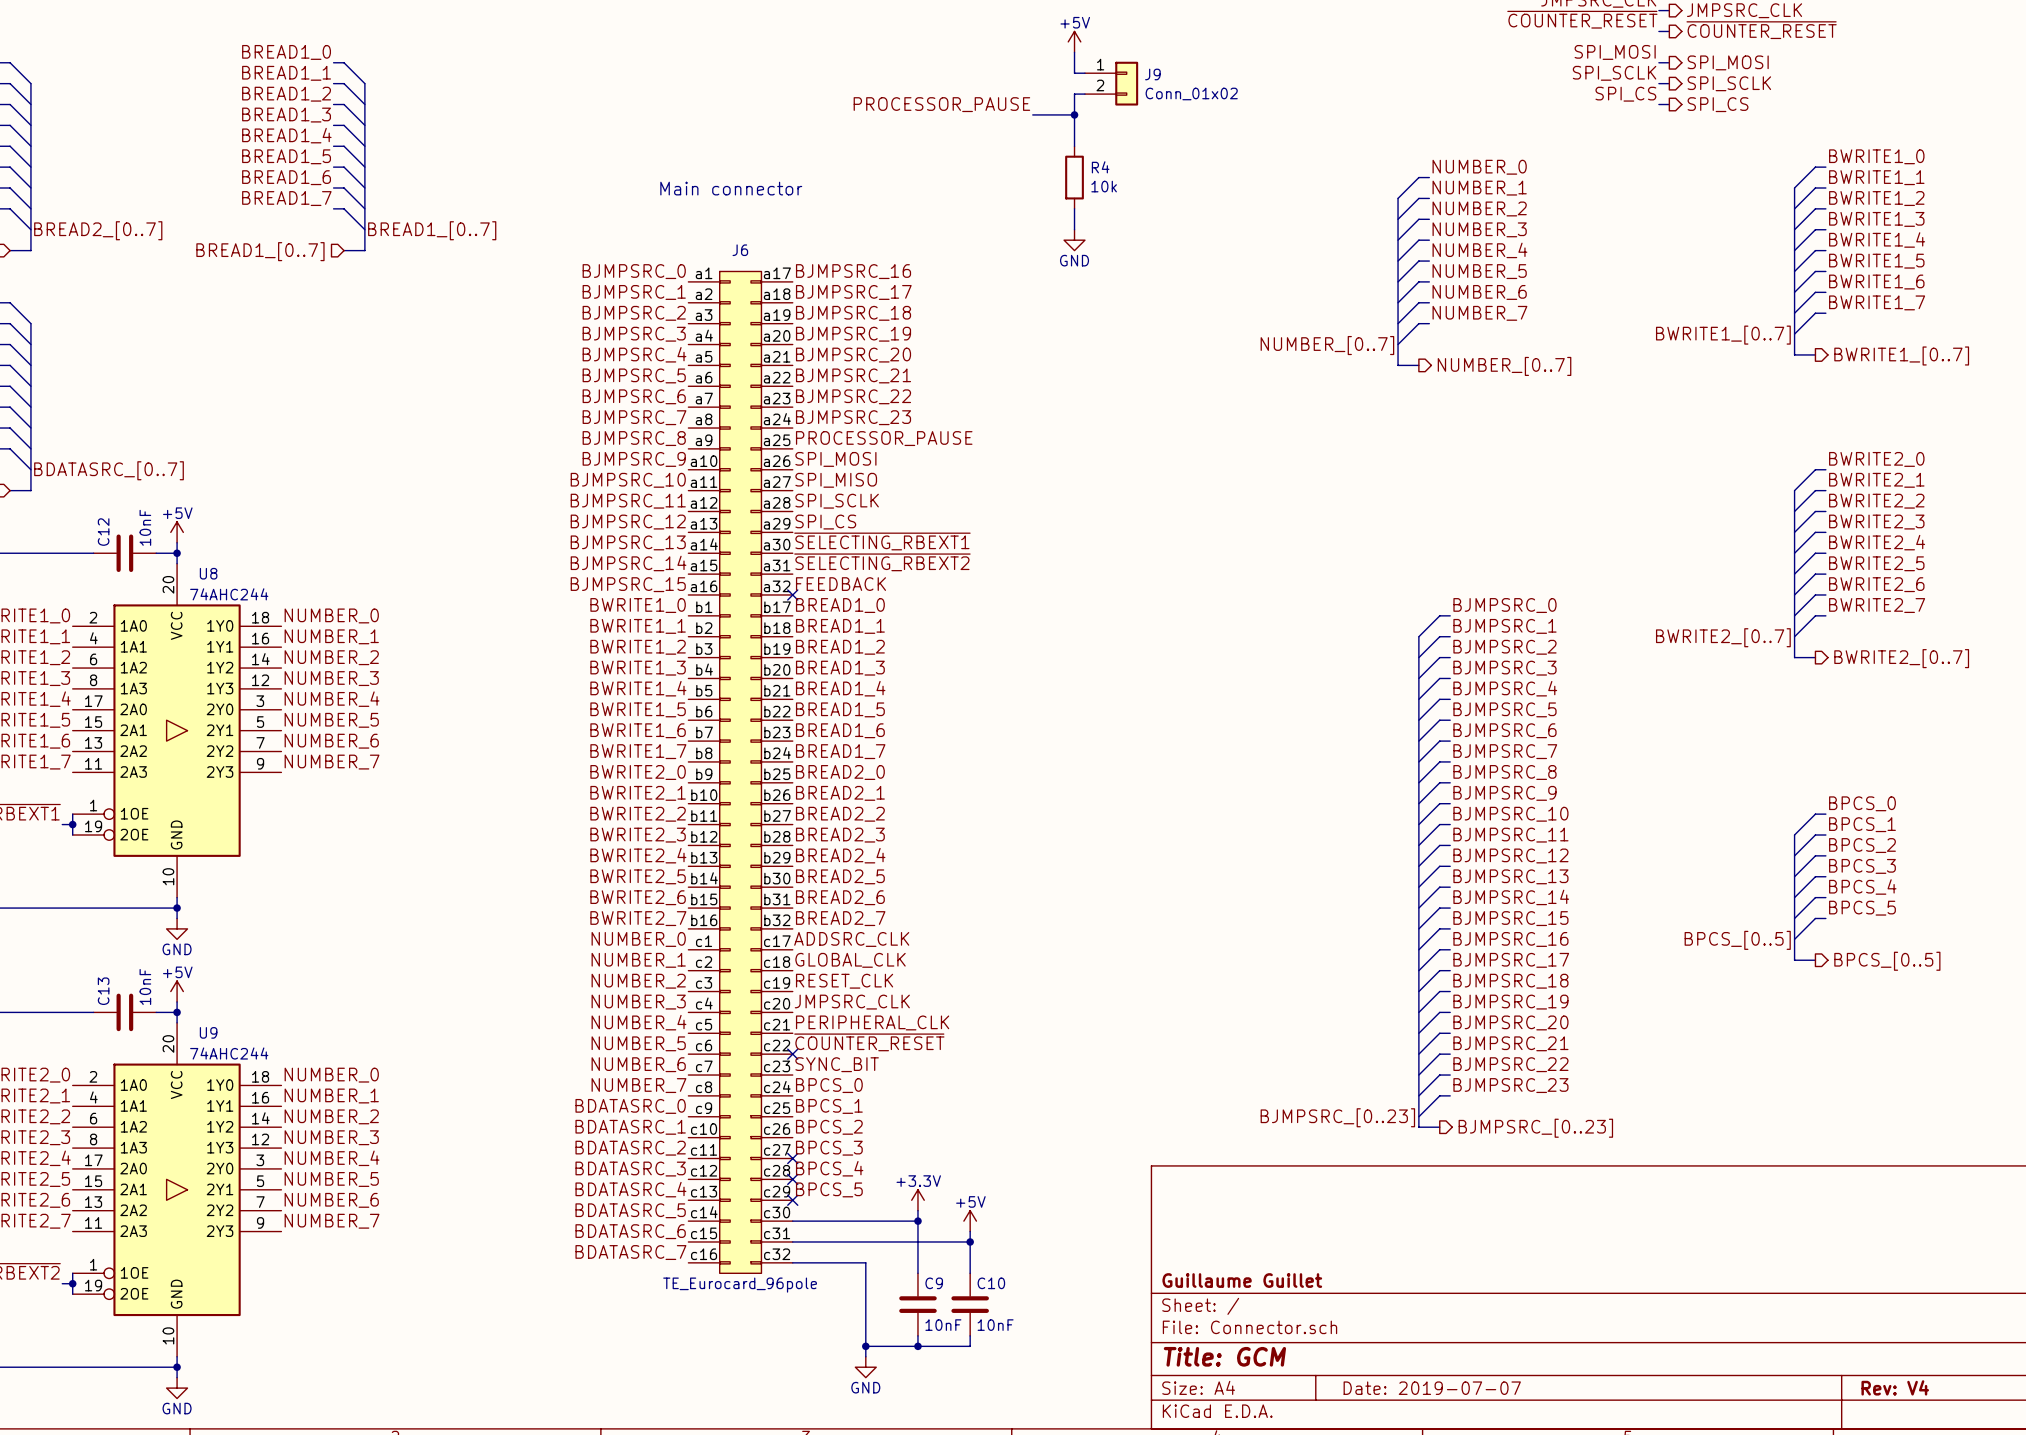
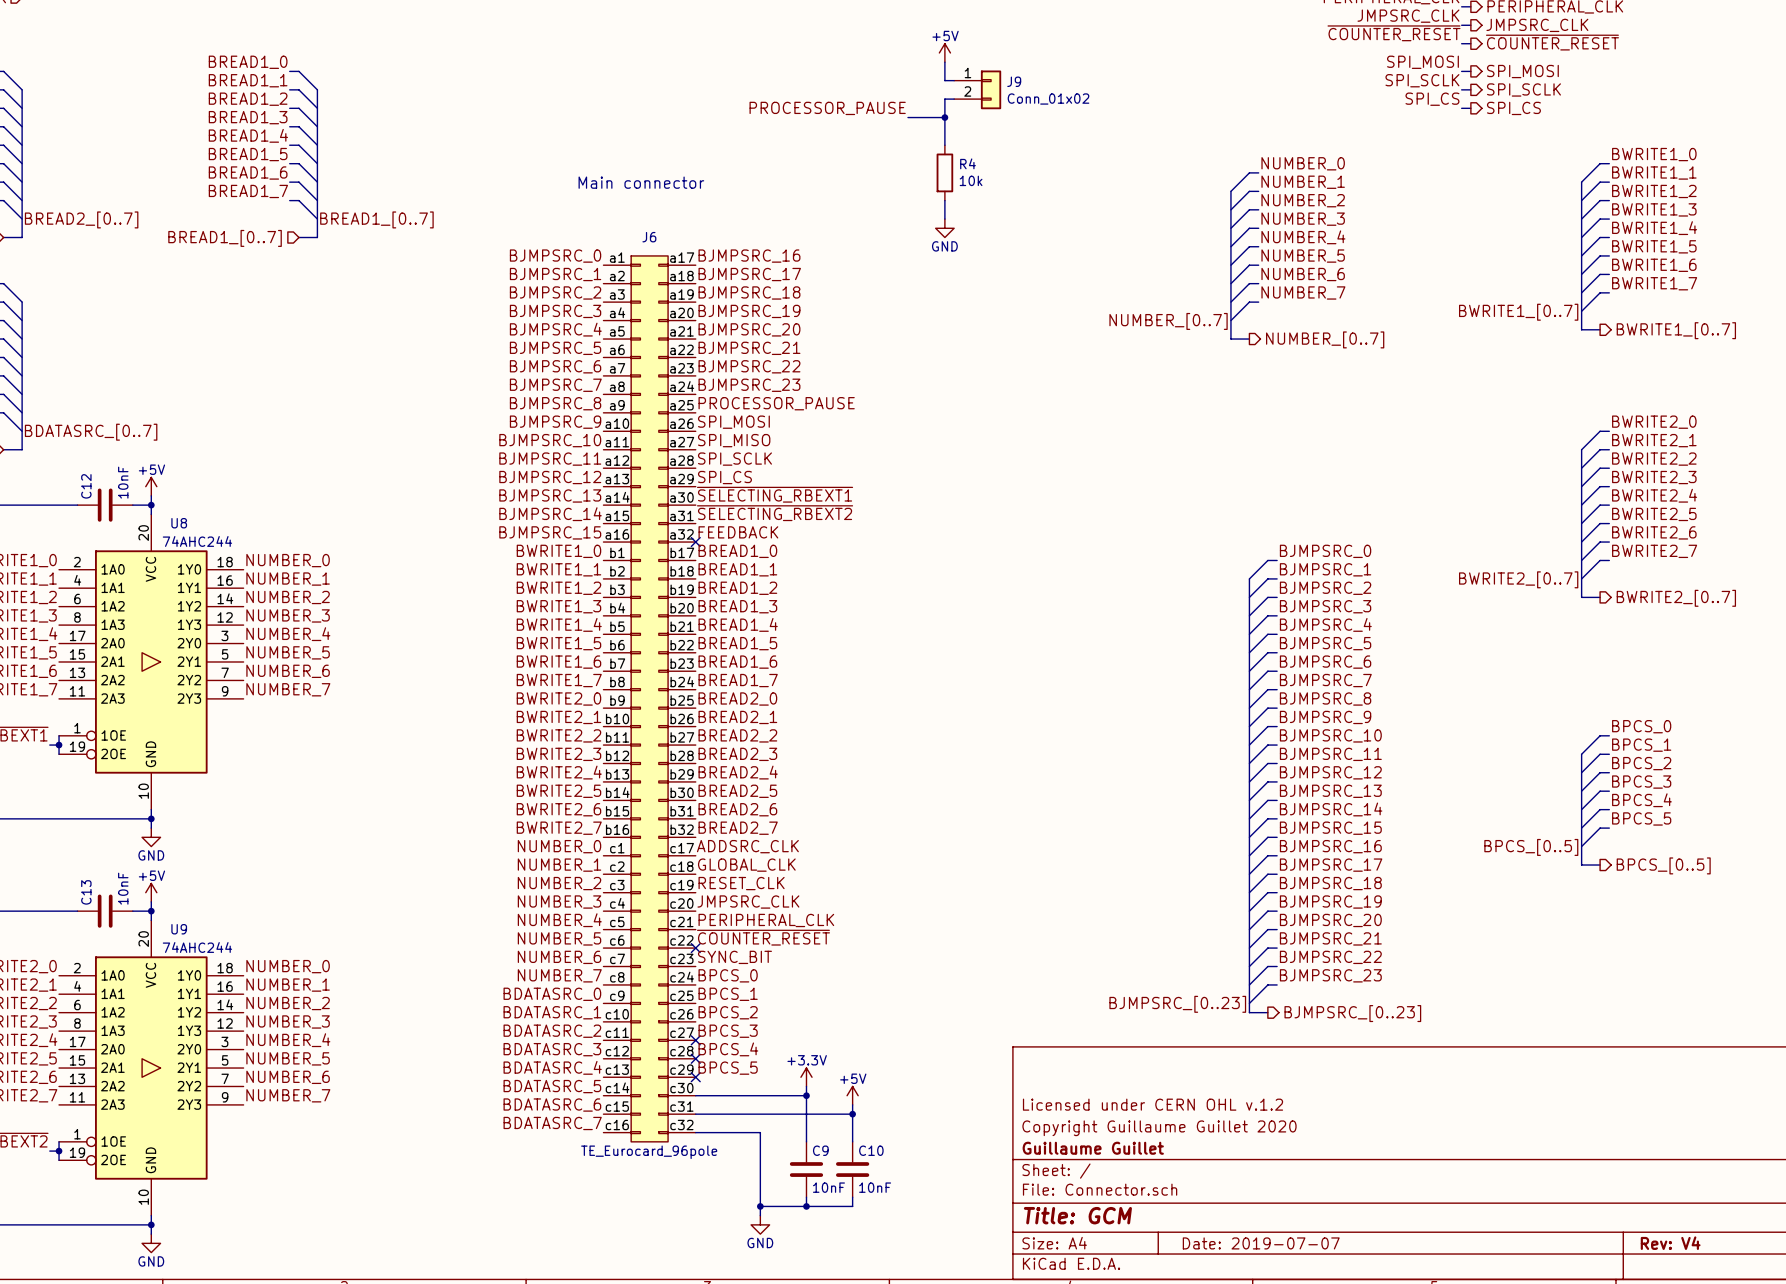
title block: none -> Licensed under CERN OHL v.1.2 (1153, 1104)
title block: none -> Copyright Guillaume Guillet 2020 (1159, 1128)

